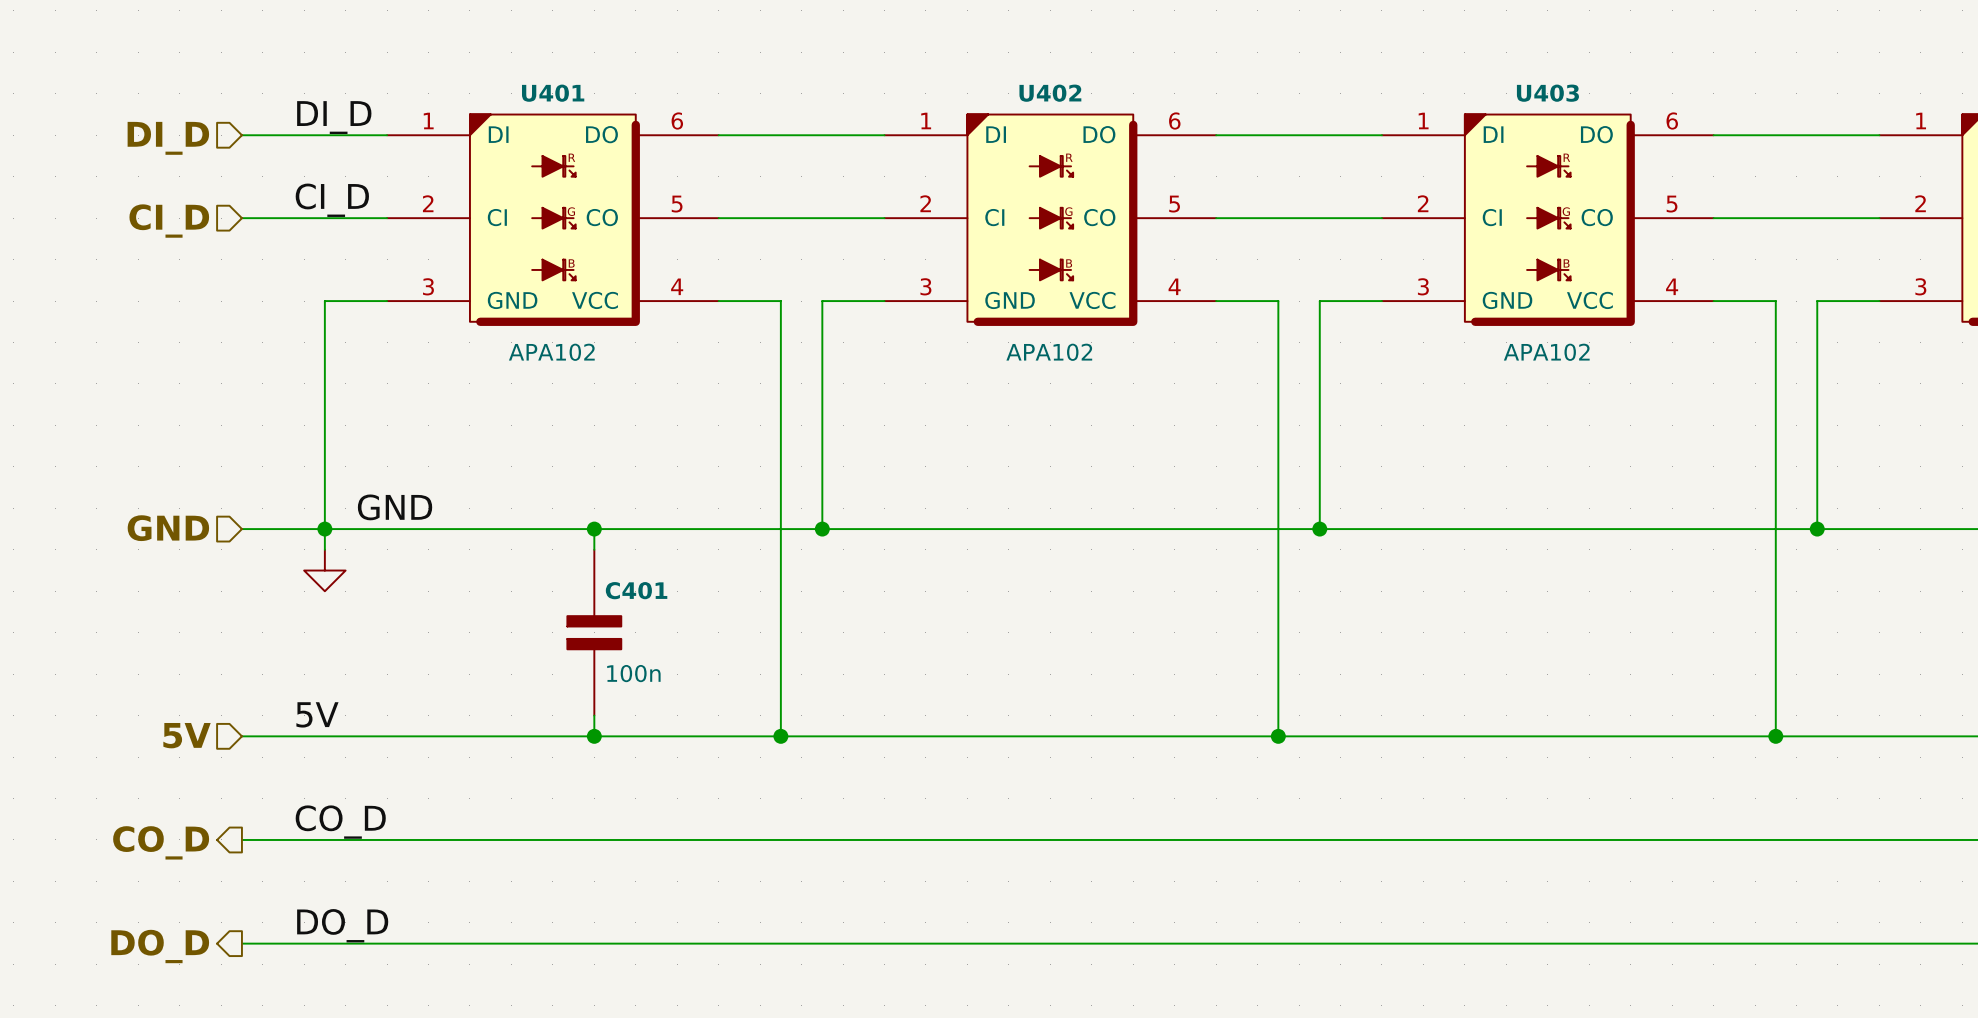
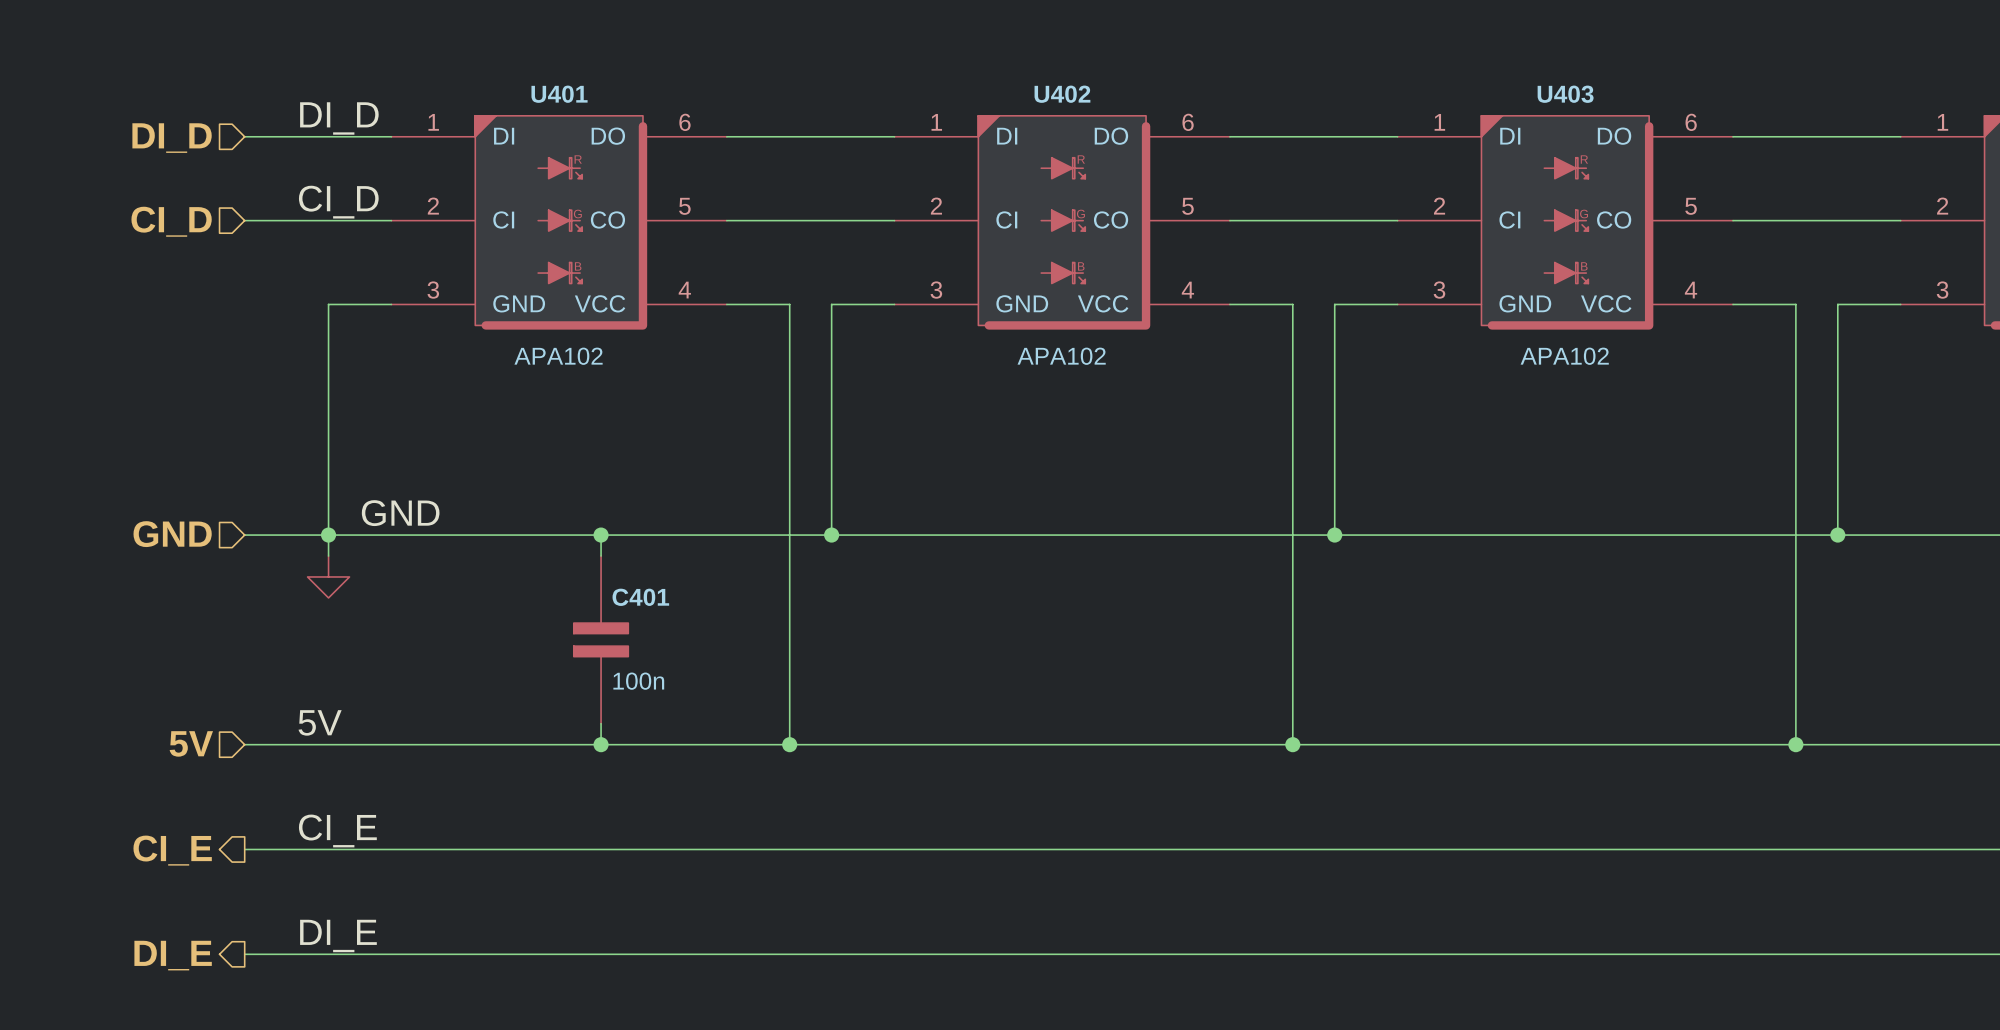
label: CO_D (340, 822) -> CI_E (337, 830)
hierarchical label: CO_D (161, 842) -> CI_E (172, 850)
label: DO_D (342, 925) -> DI_E (338, 935)
hierarchical label: DO_D (160, 946) -> DI_E (173, 955)

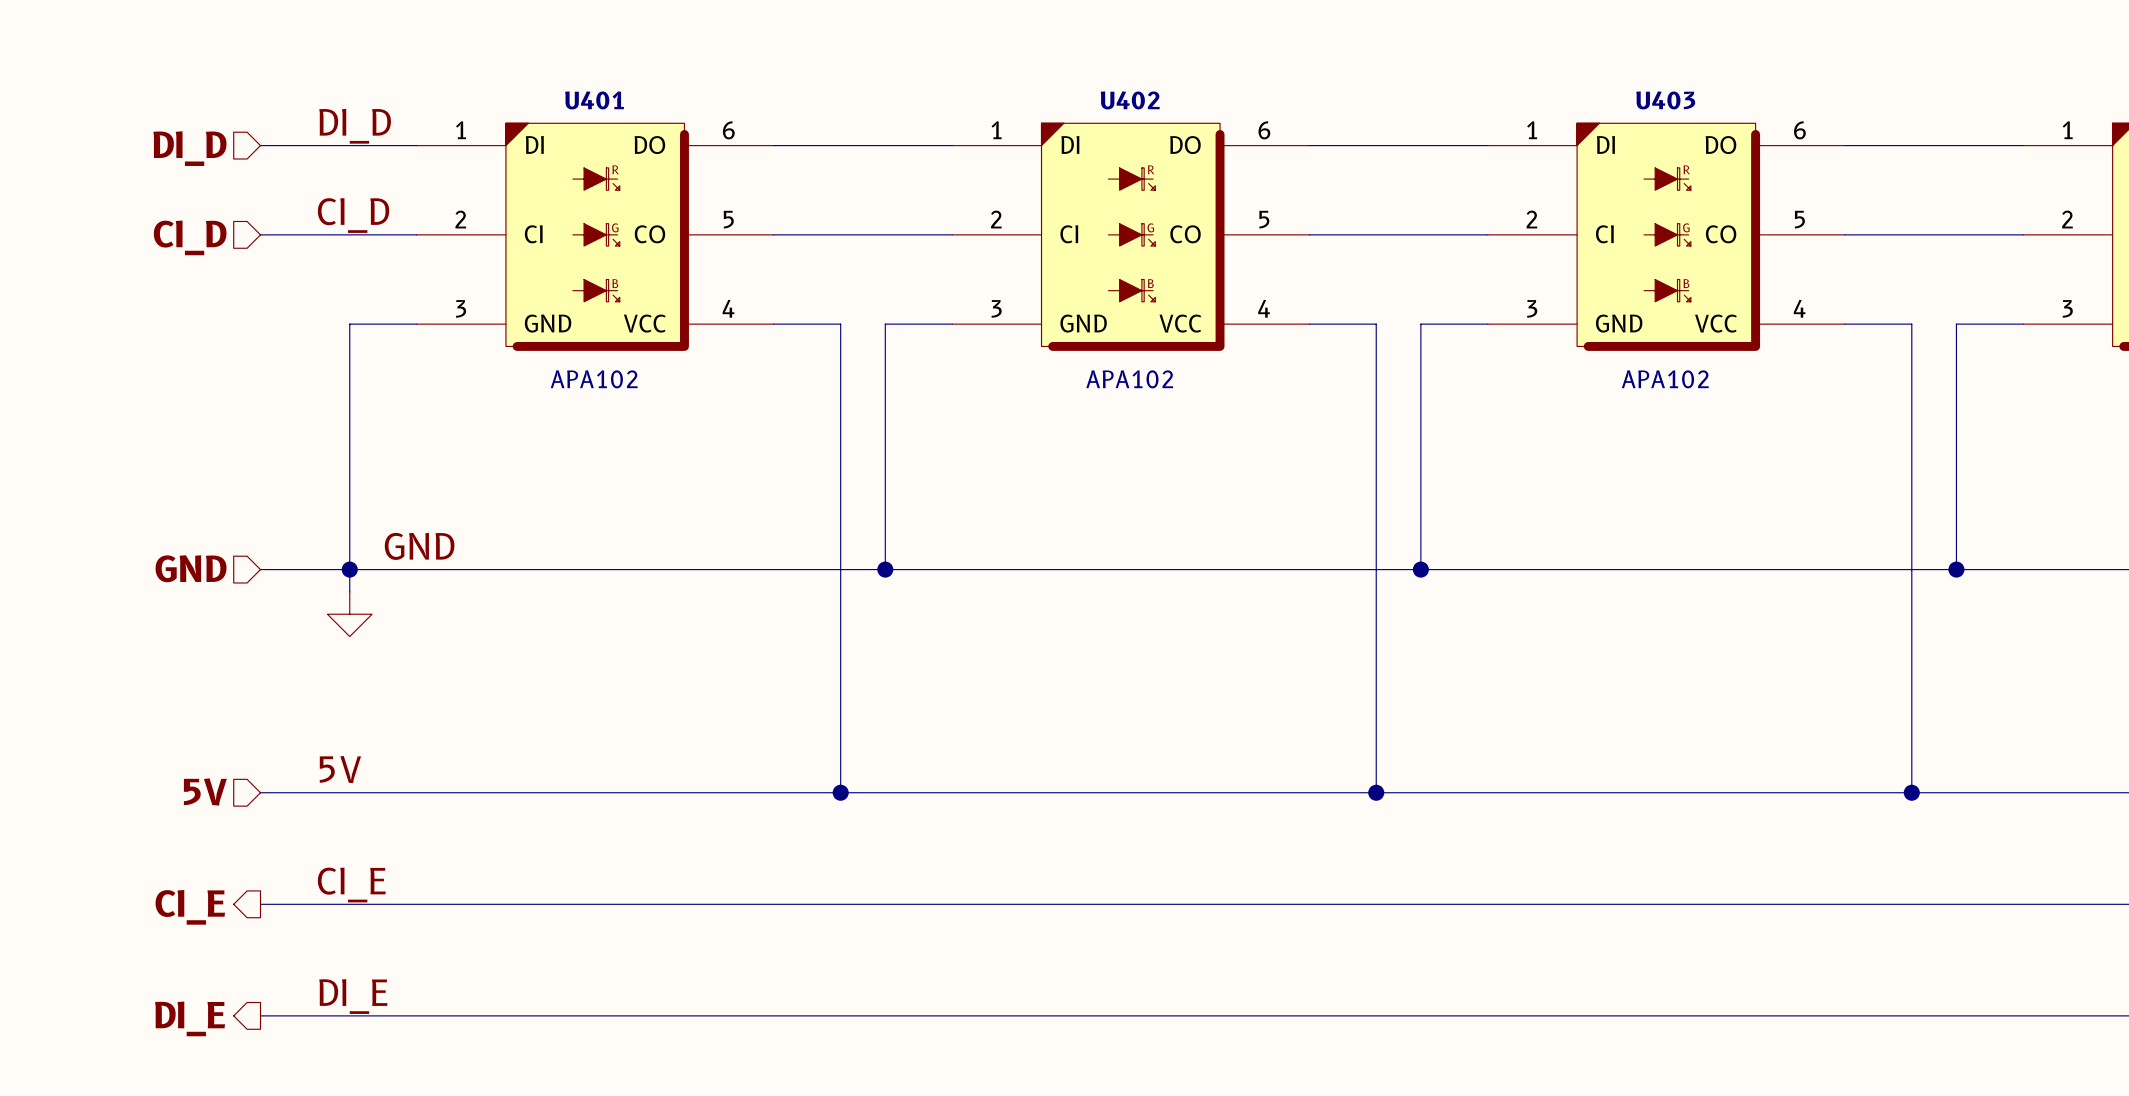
wire: (601, 535) (601, 556) -> none
junction: (601, 535) -> none
C401: 100n (601, 639) -> none
wire: (601, 723) (601, 744) -> none
junction: (601, 744) -> none

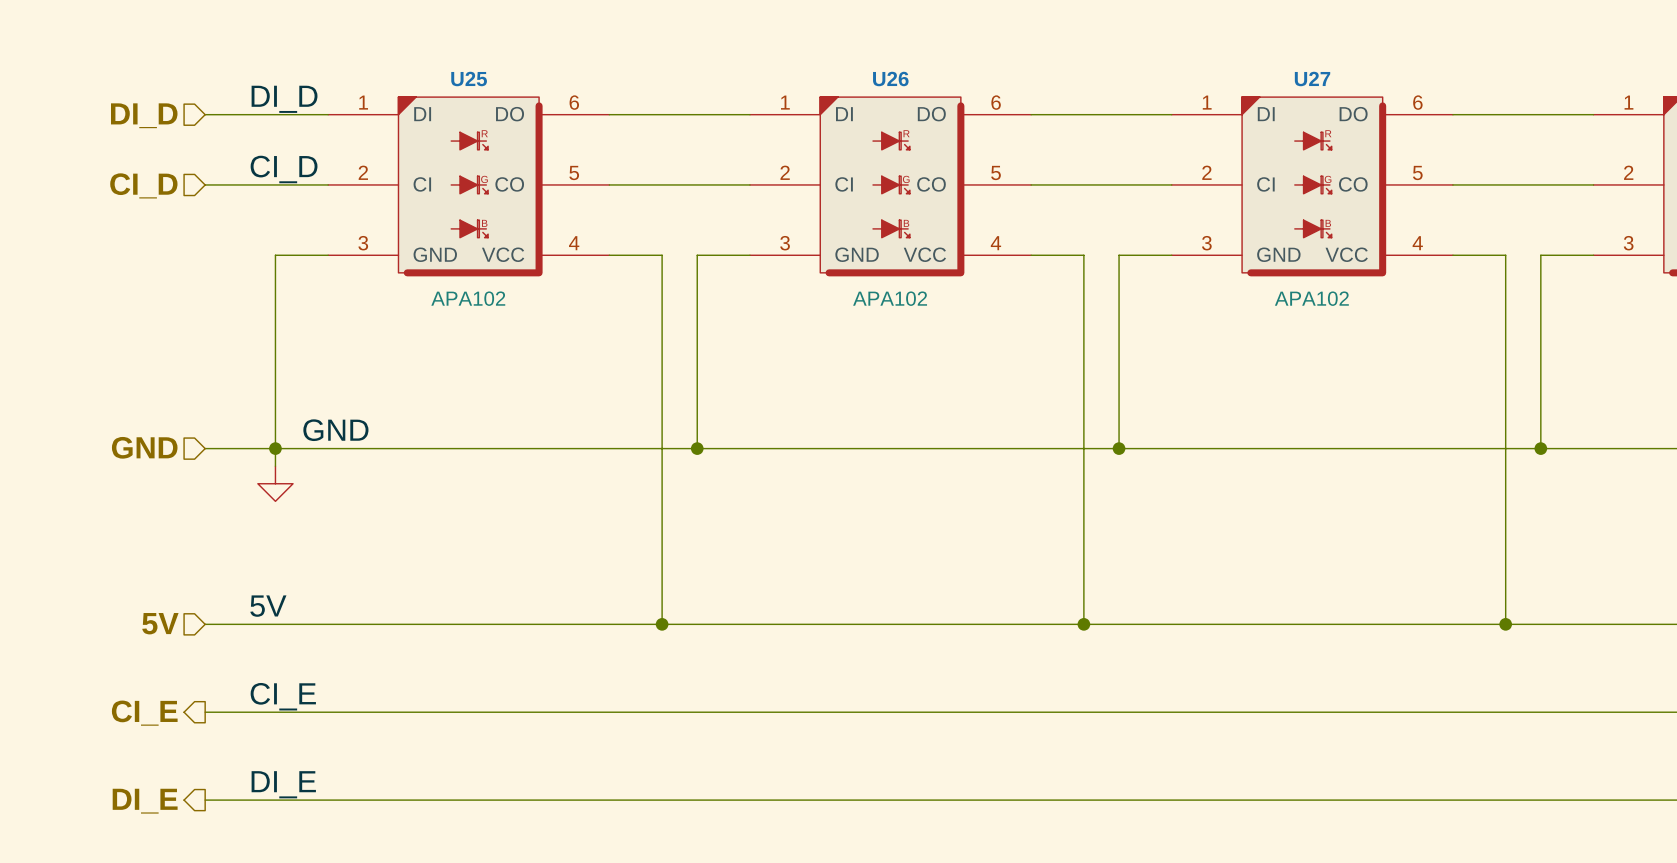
U401 name: U401 (594, 100) -> U25 (469, 78)
U402 name: U402 (1130, 100) -> U26 (890, 78)
U403 name: U403 (1665, 100) -> U27 (1312, 78)

